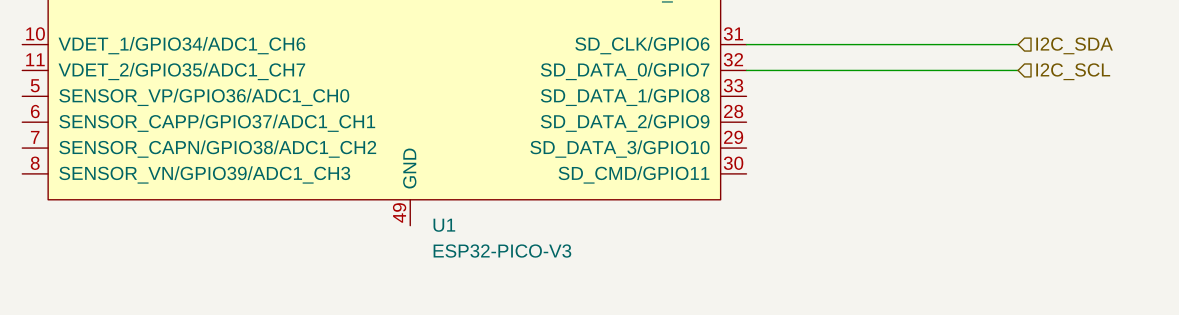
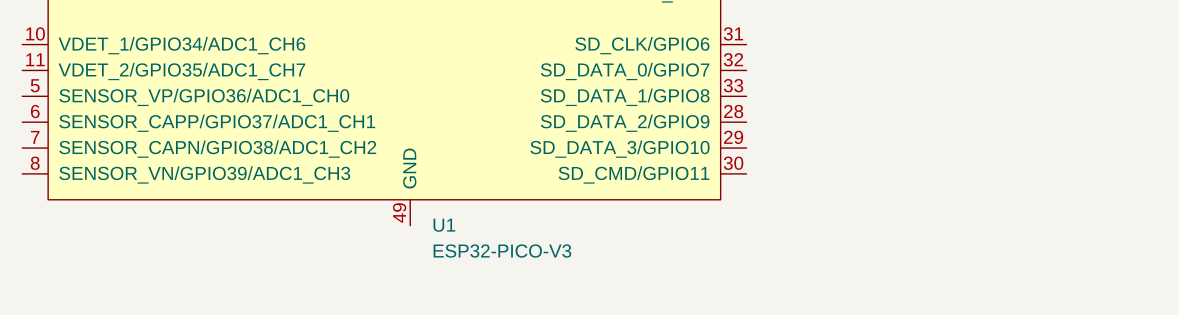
wire: (746, 44) (1018, 44) -> none
hierarchical label: I2C_SDA (1074, 45) -> none
wire: (746, 70) (1018, 70) -> none
hierarchical label: I2C_SCL (1073, 71) -> none

